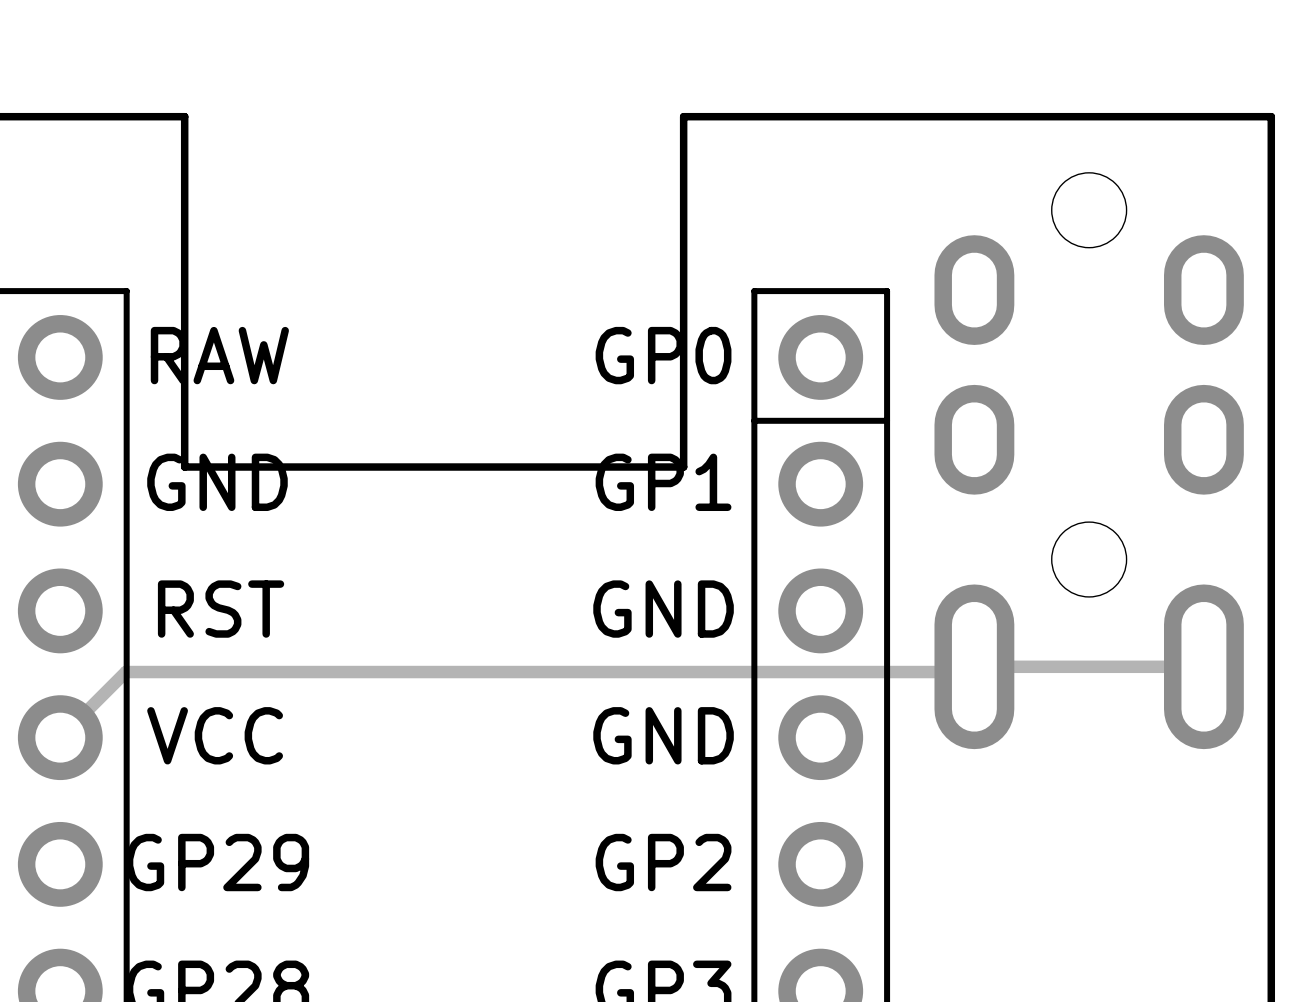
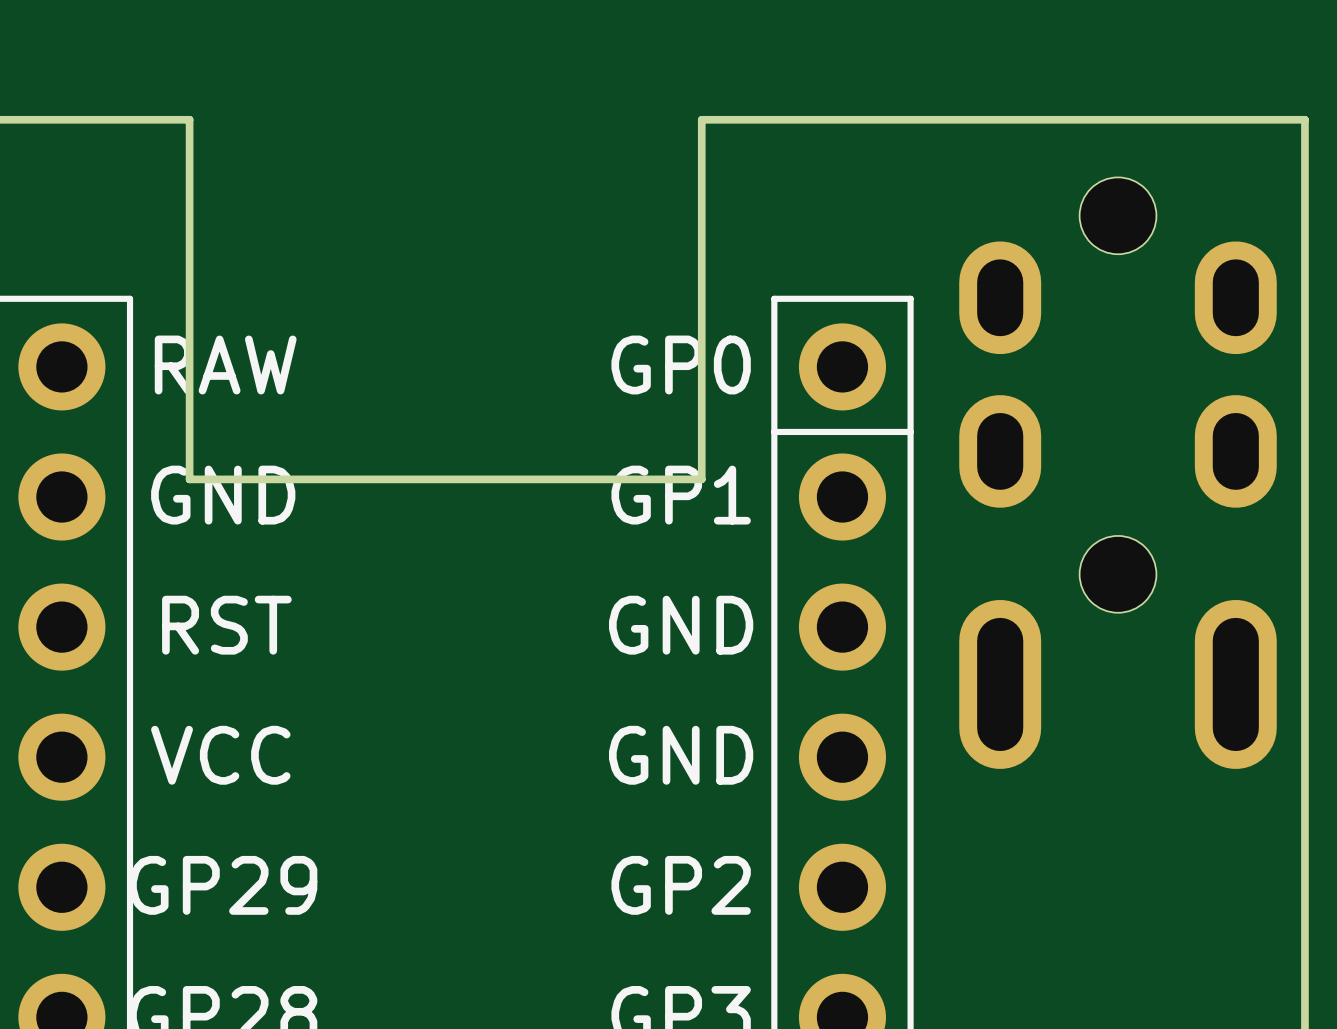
track: (974, 666) (1203, 666) -> none
track: (969, 672) (125, 672) (60, 737) -> none

